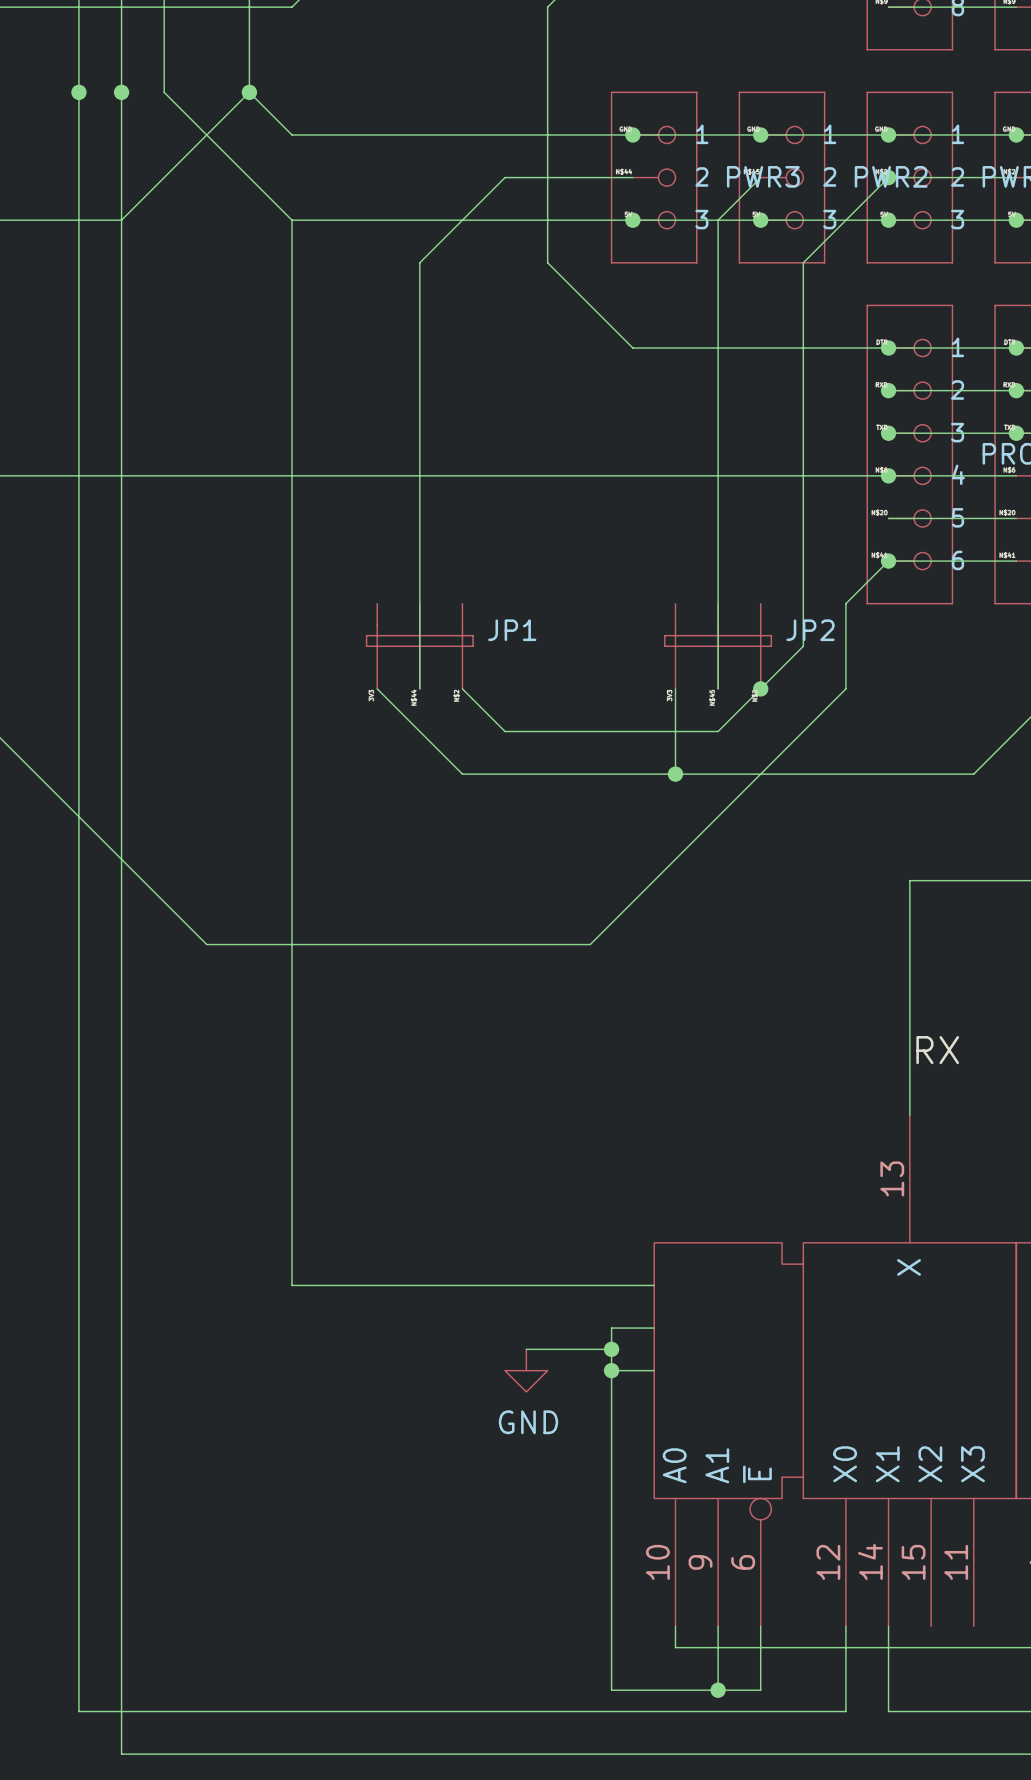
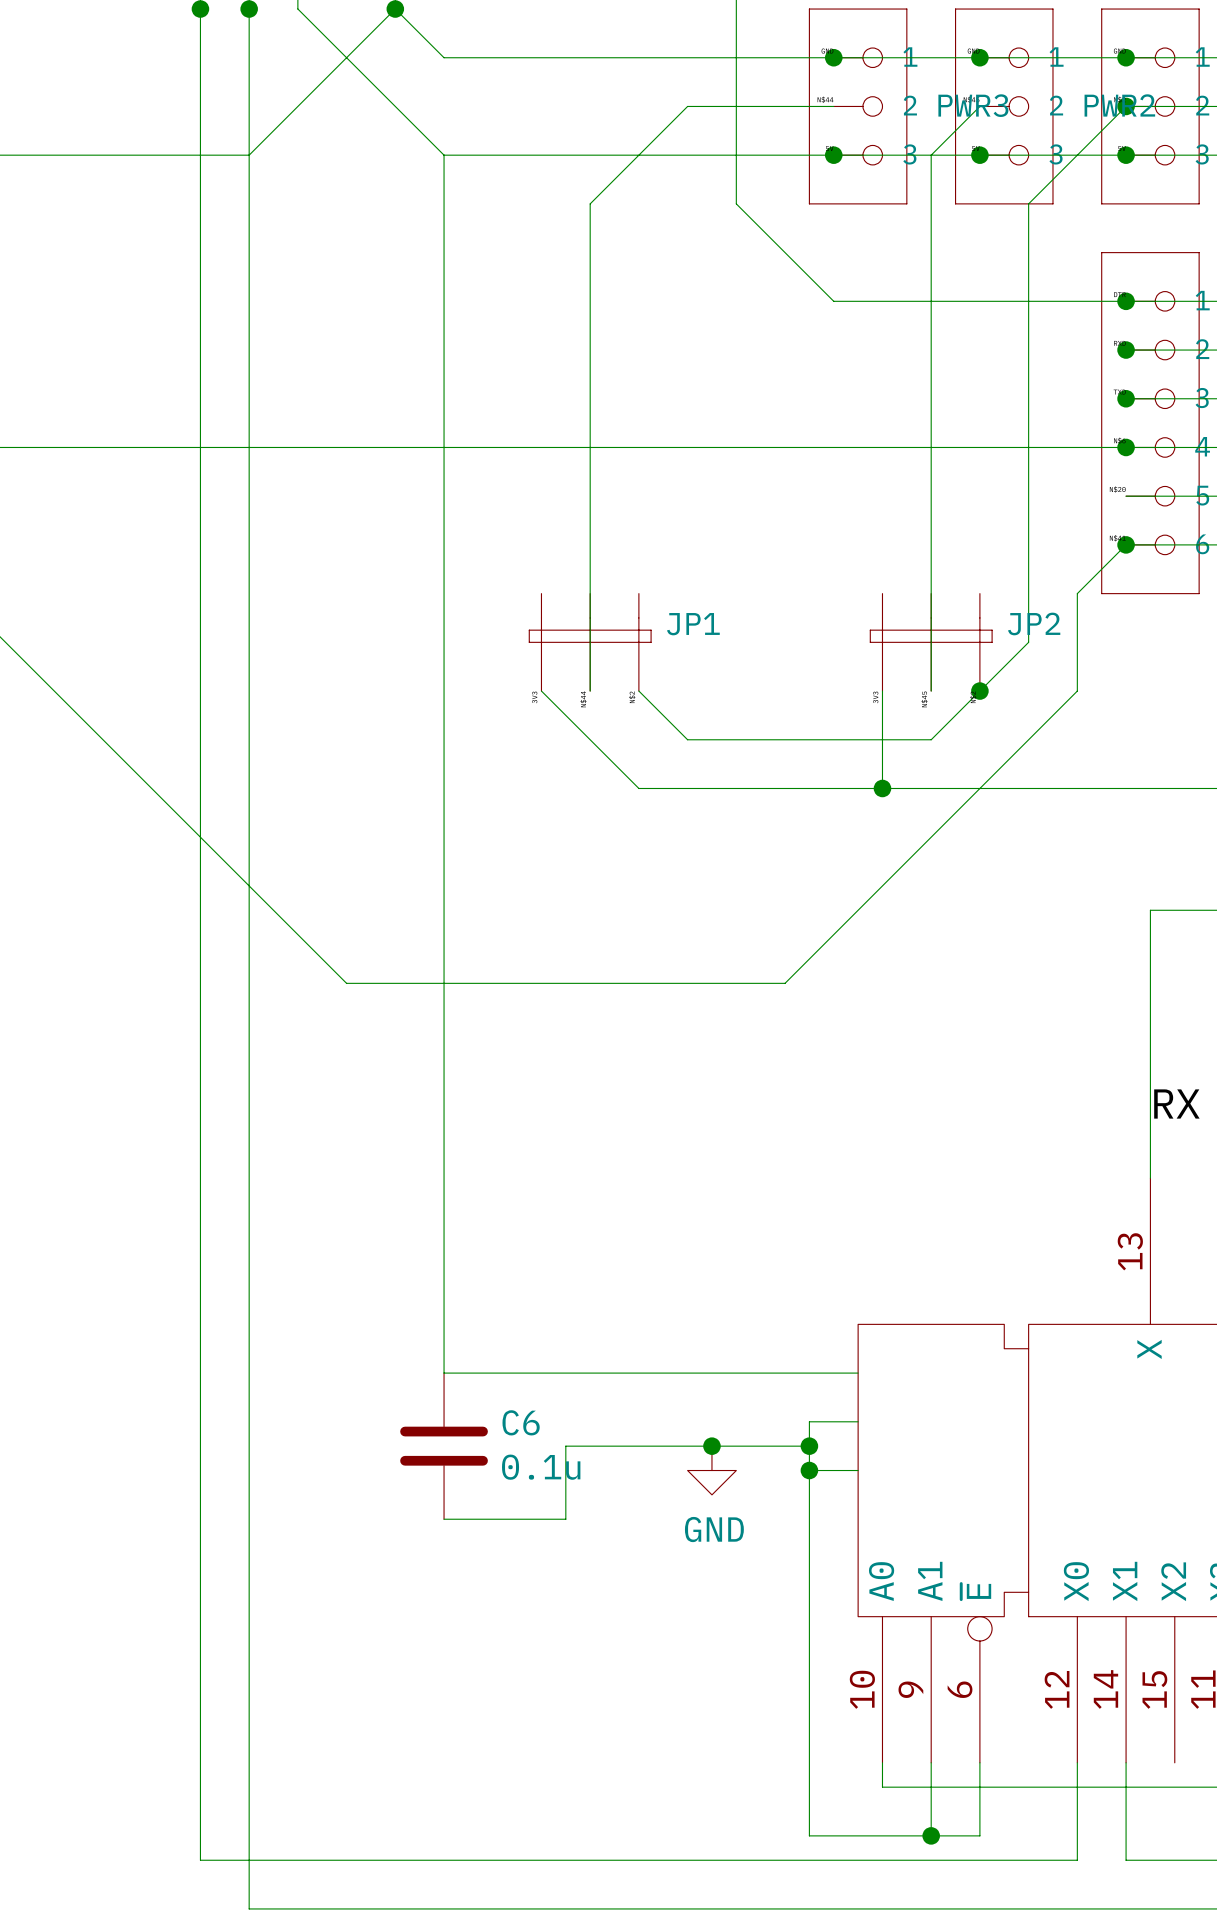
C6: none -> 0.1u (444, 1446)
wire: none -> (711, 1446) (565, 1446) (565, 1519) (444, 1519)
junction: none -> (711, 1446)

